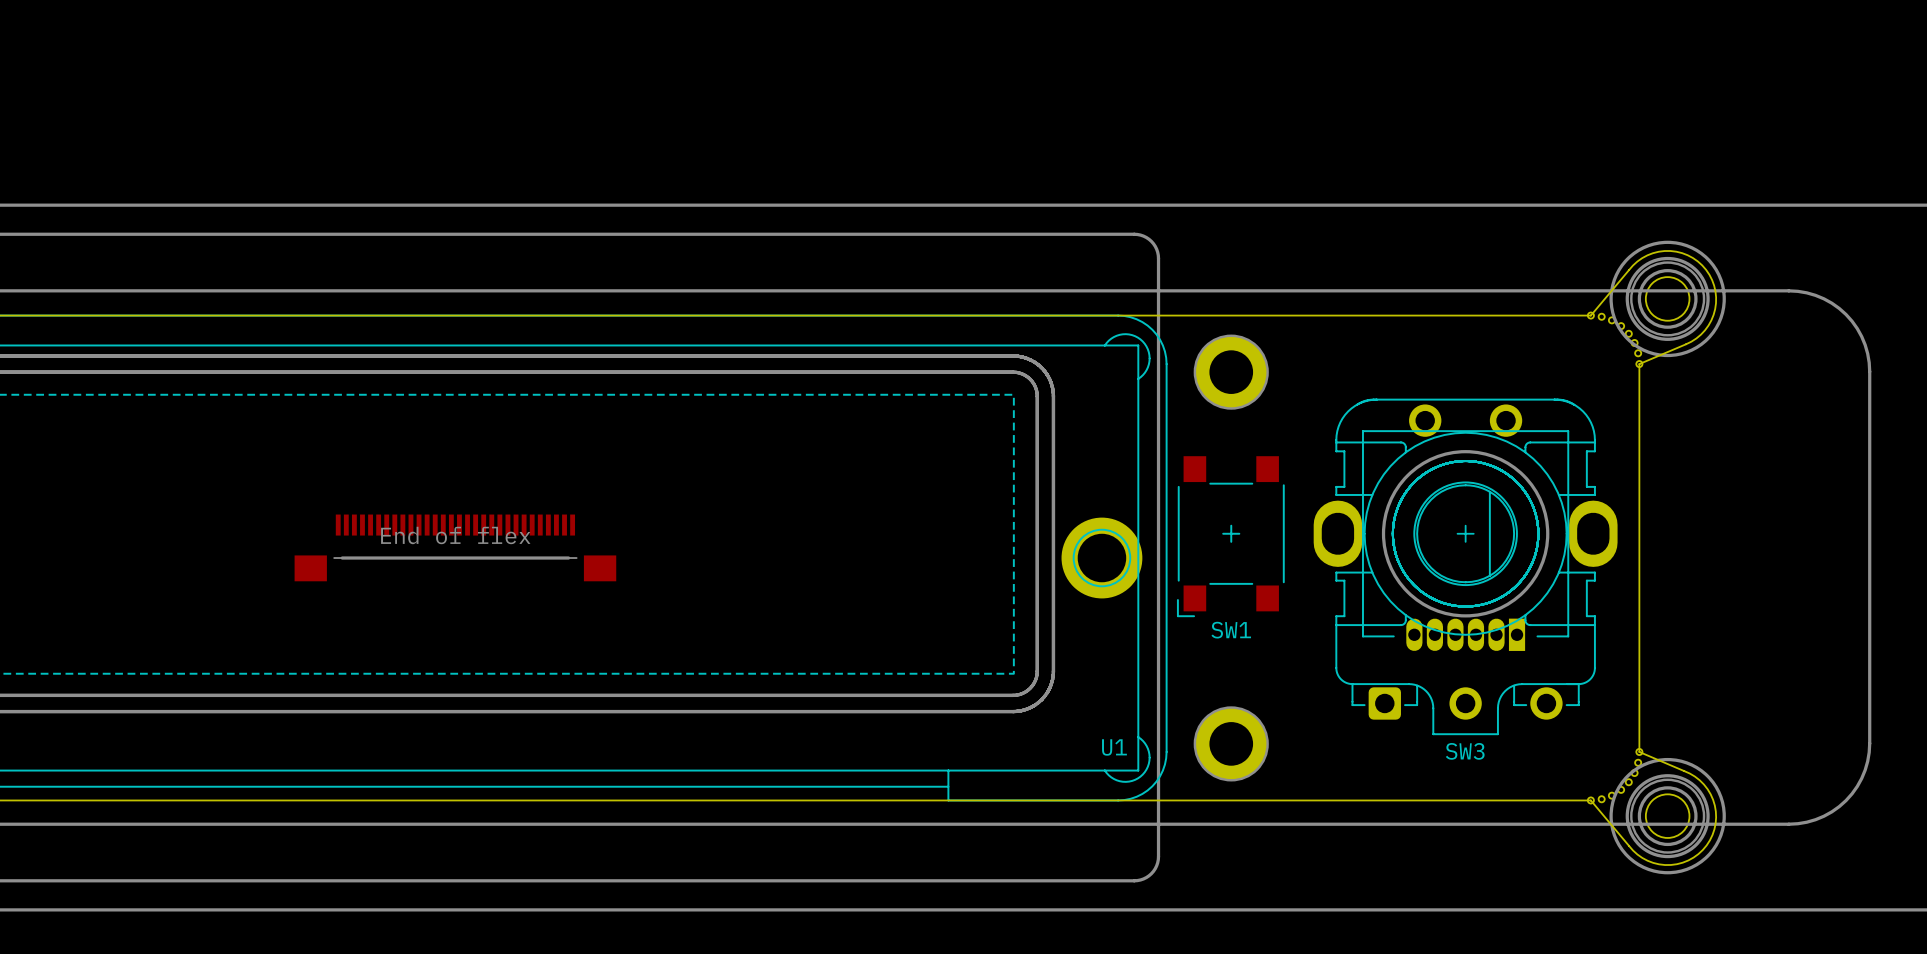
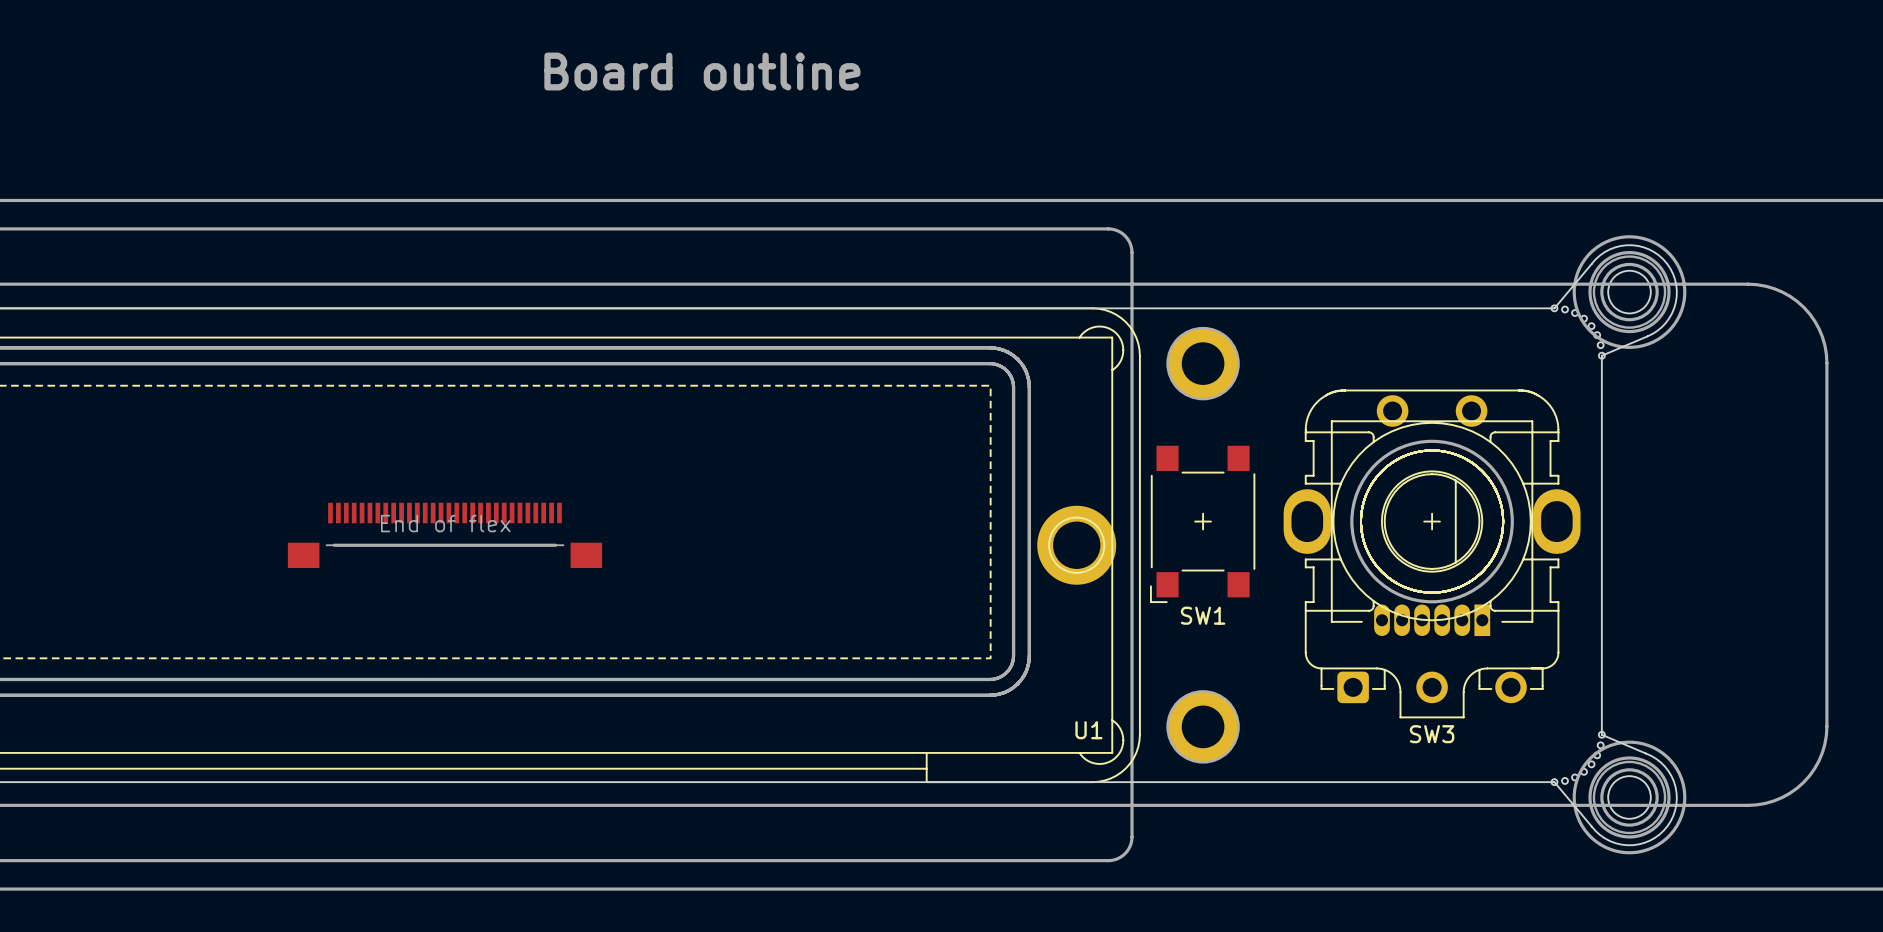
text: none -> Board outline (702, 71)

